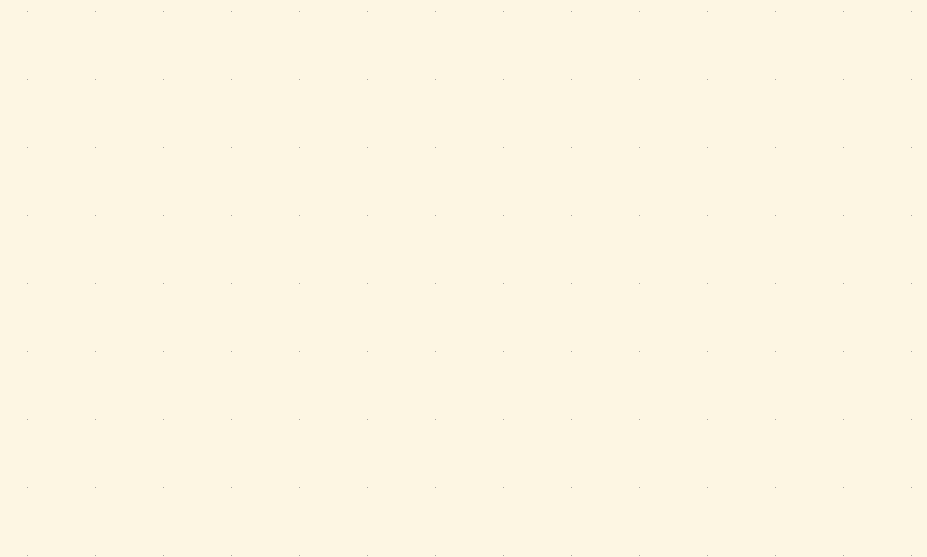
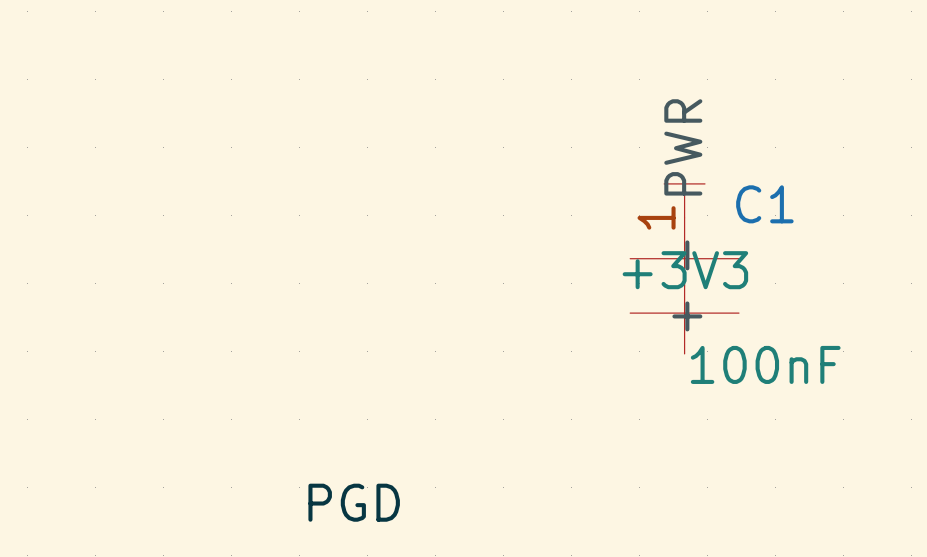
power symbol: none -> +3V3 (684, 200)
C1: none -> 100nF (684, 285)
label: none -> PGD (354, 502)

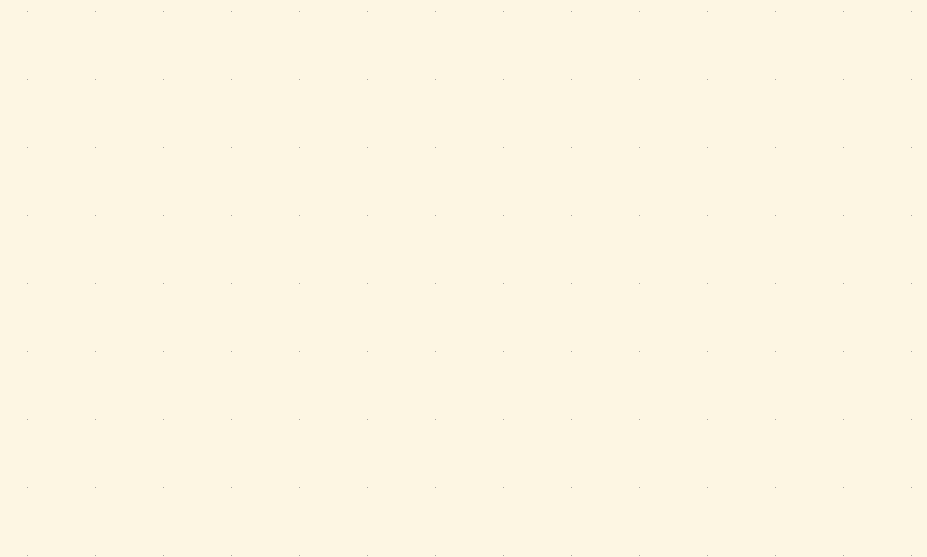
power symbol: +3V3 (684, 200) -> none
C1: 100nF (684, 285) -> none
label: PGD (354, 502) -> none

